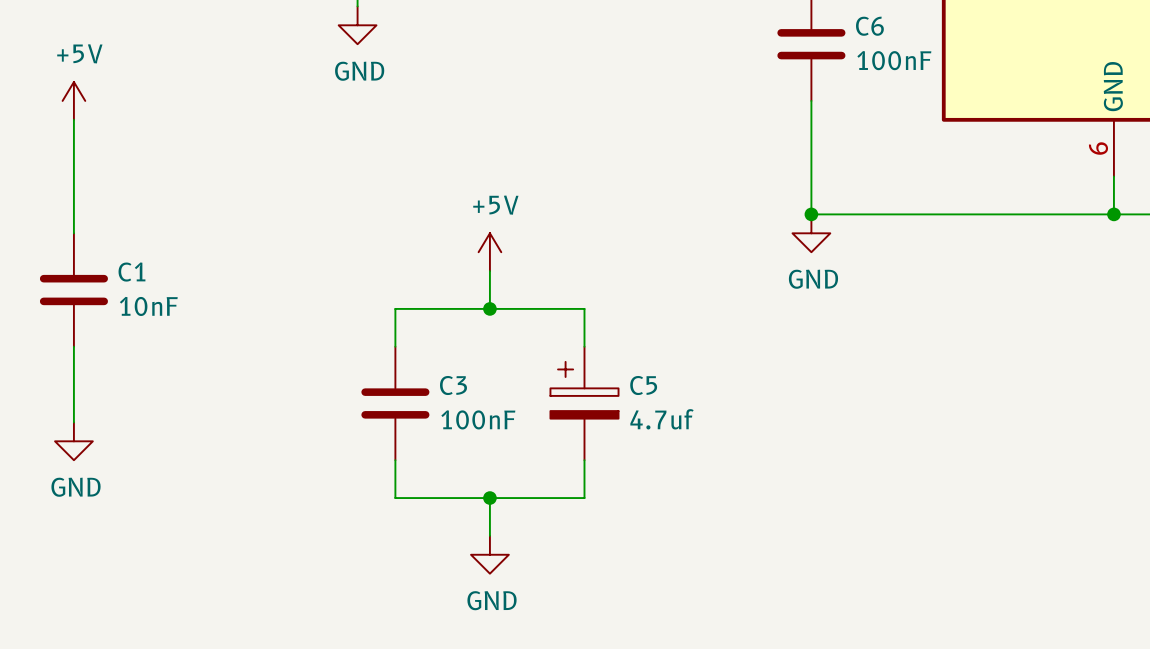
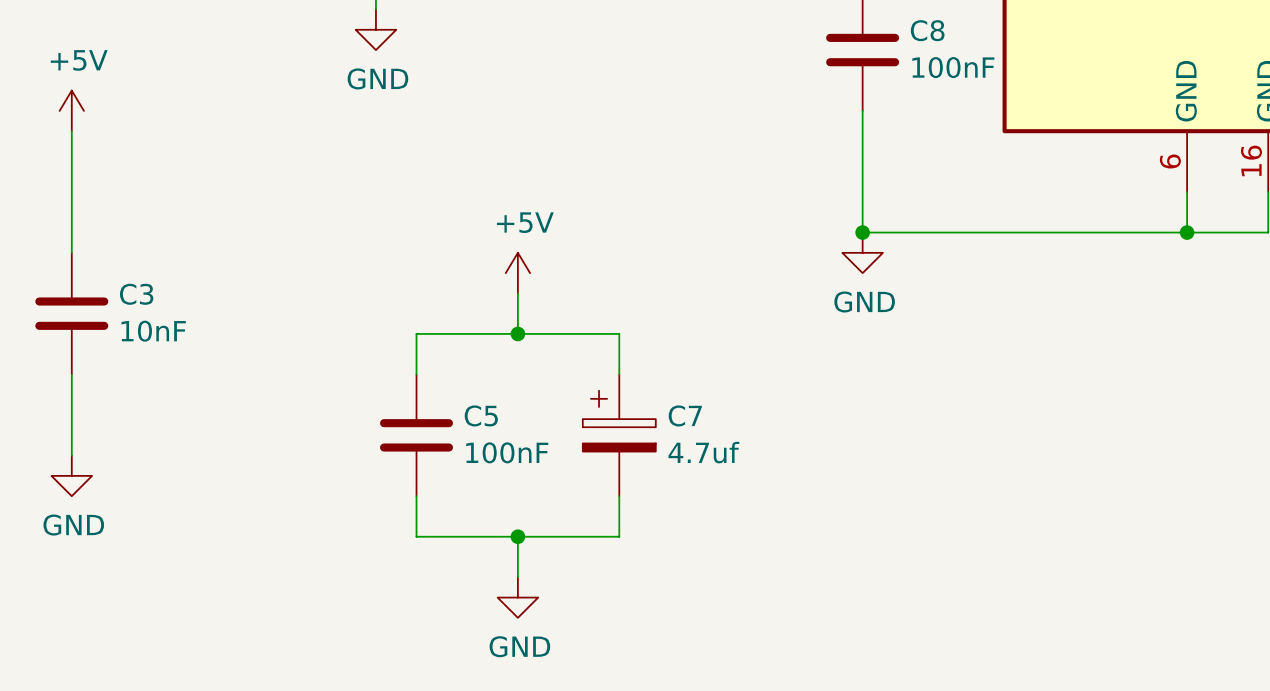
C6 name: C6 (869, 26) -> C8 (927, 30)
C1 name: C1 (131, 272) -> C3 (136, 294)
C3 name: C3 (453, 385) -> C5 (481, 415)
C5 name: C5 (643, 385) -> C7 (685, 415)

